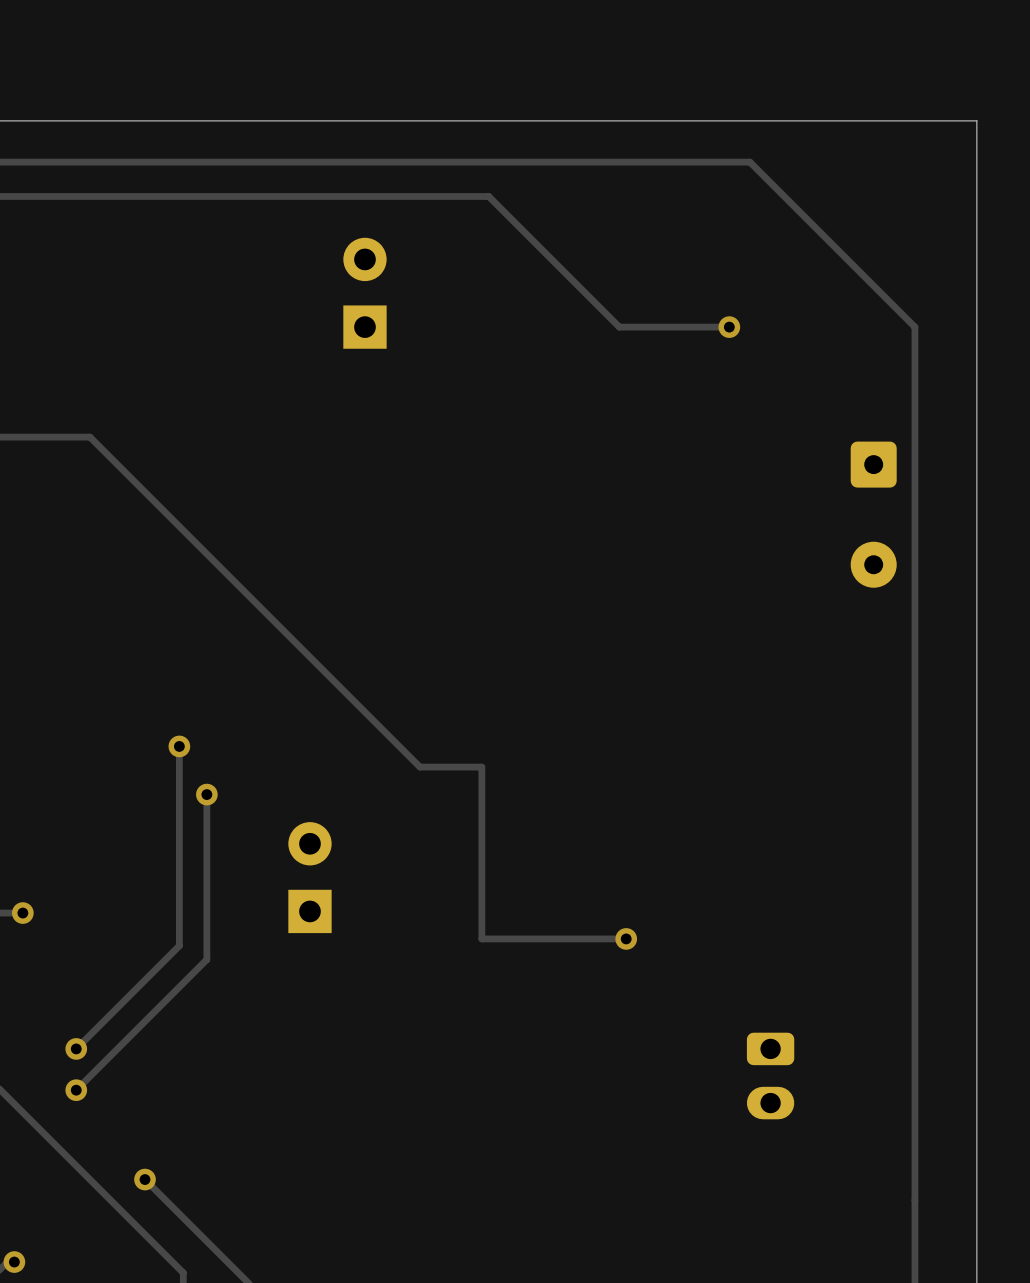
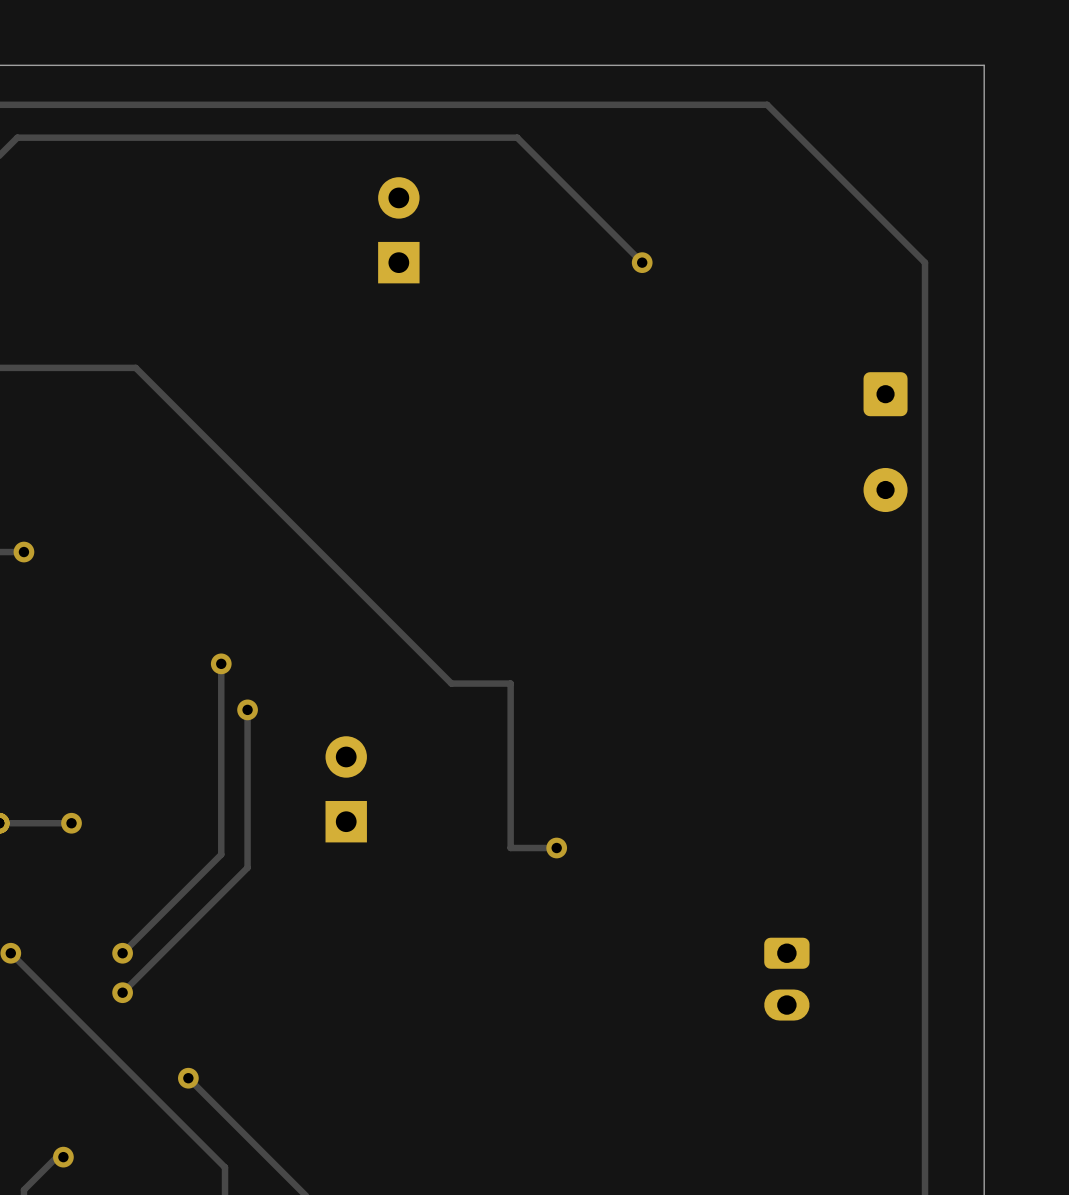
track: (729, 327) (619, 327) -> none
via position: (729, 327) -> (642, 262)
track: (626, 938) (529, 938) -> none
via position: (626, 938) -> (556, 848)

